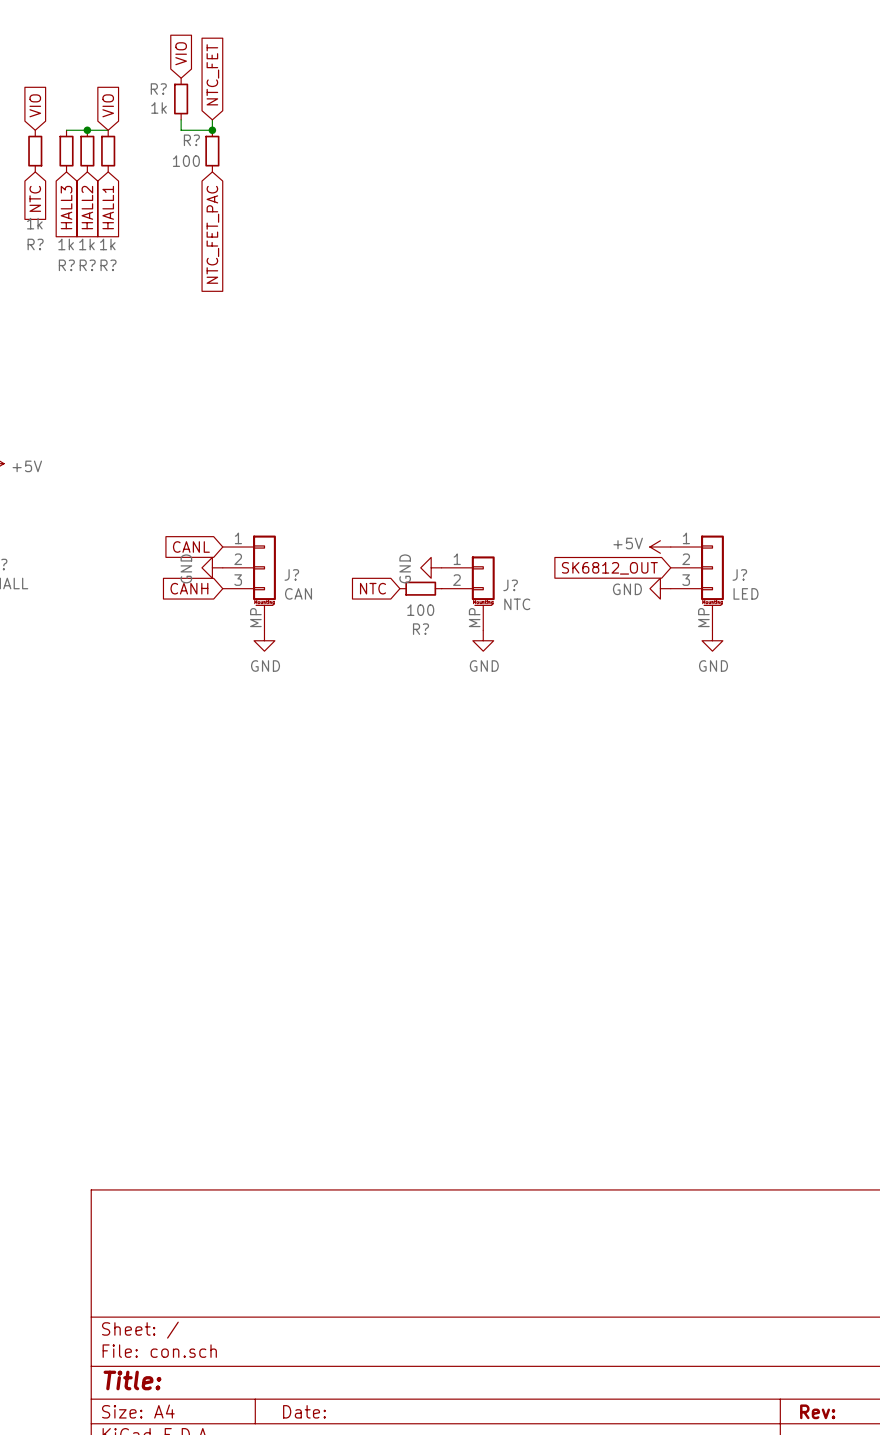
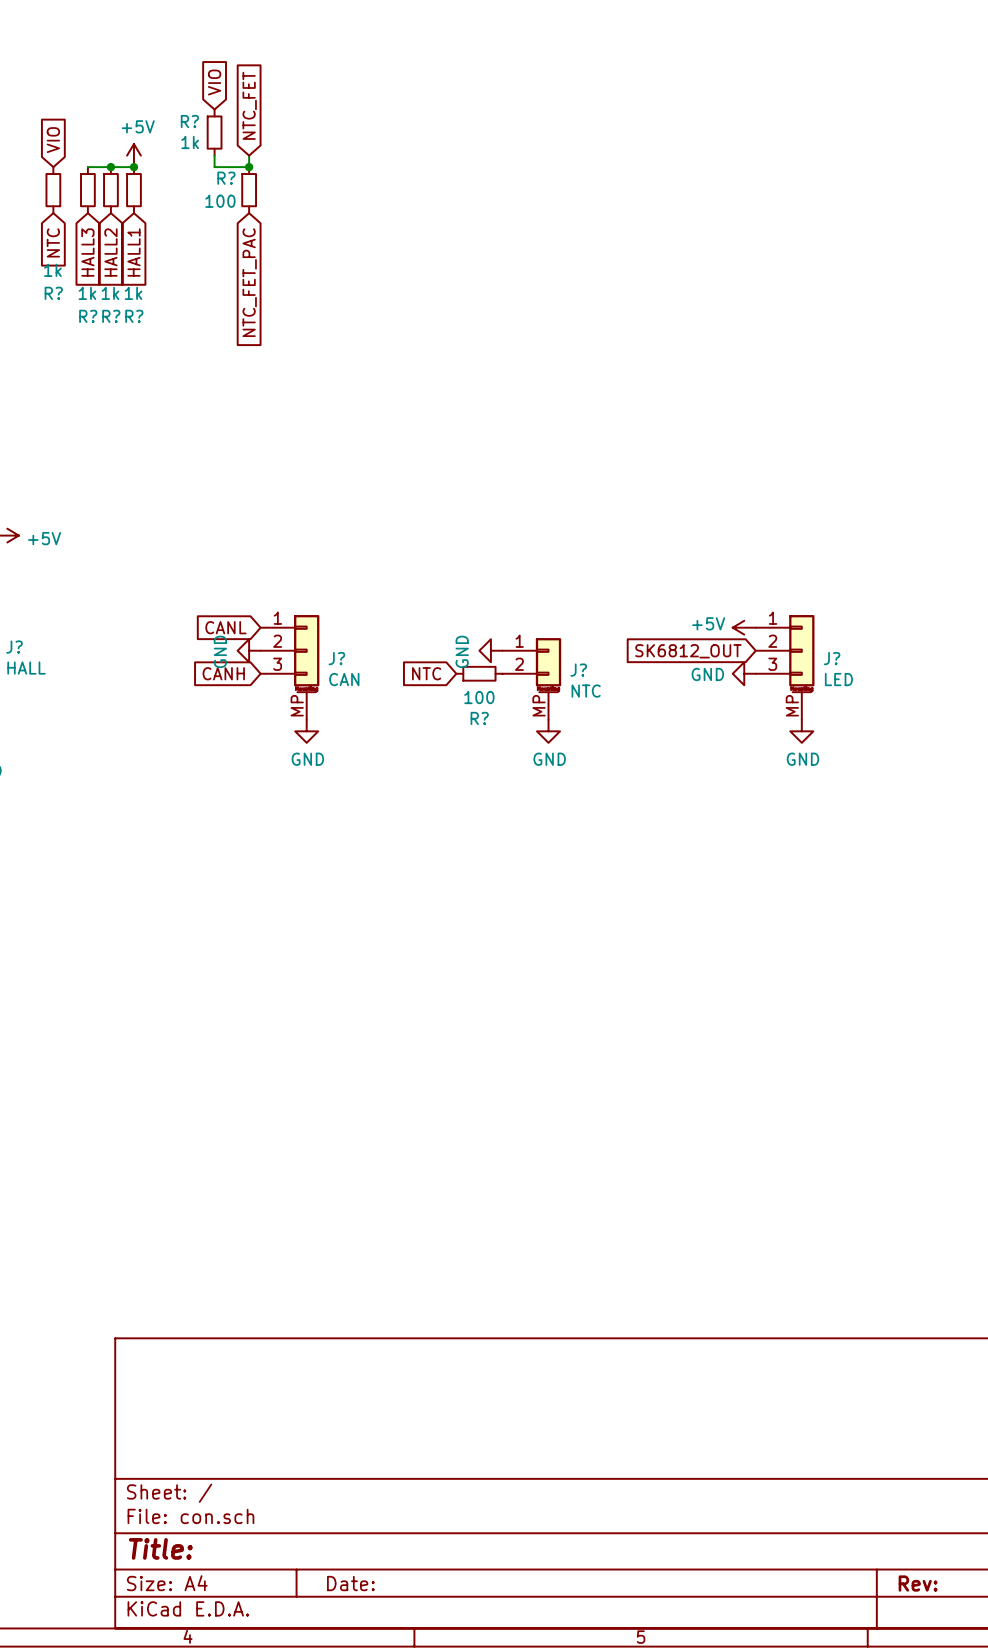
global label: VIO (108, 105) -> none
power symbol: none -> +5V (133, 155)
junction: none -> (133, 167)

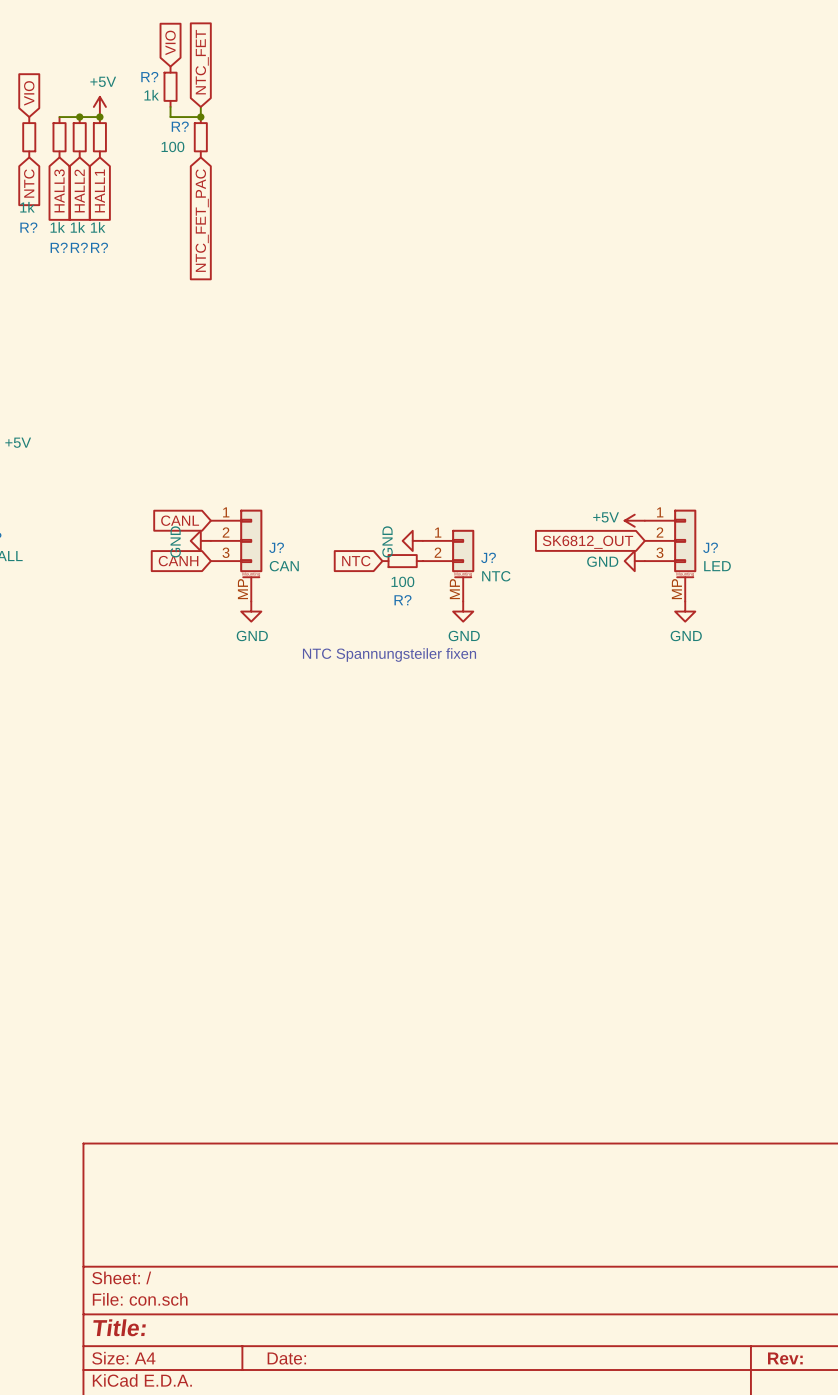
text: none -> NTC Spannungsteiler fixen (389, 654)

